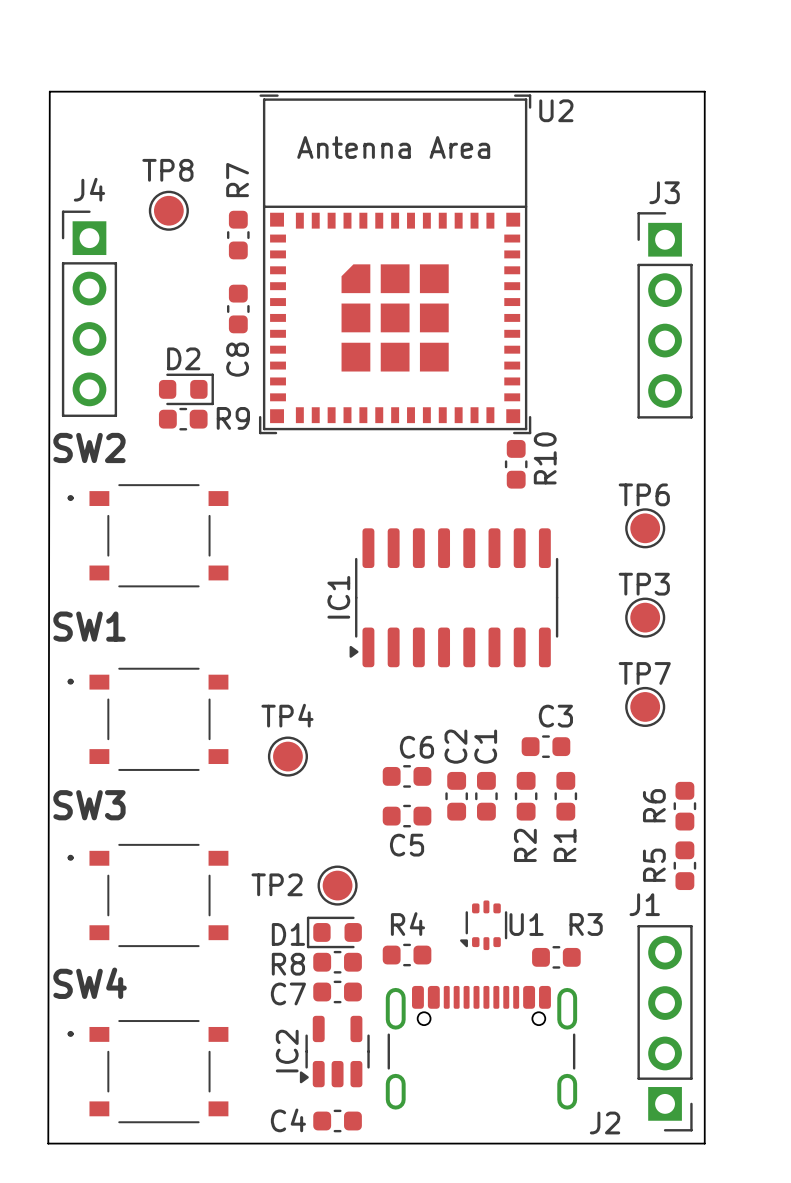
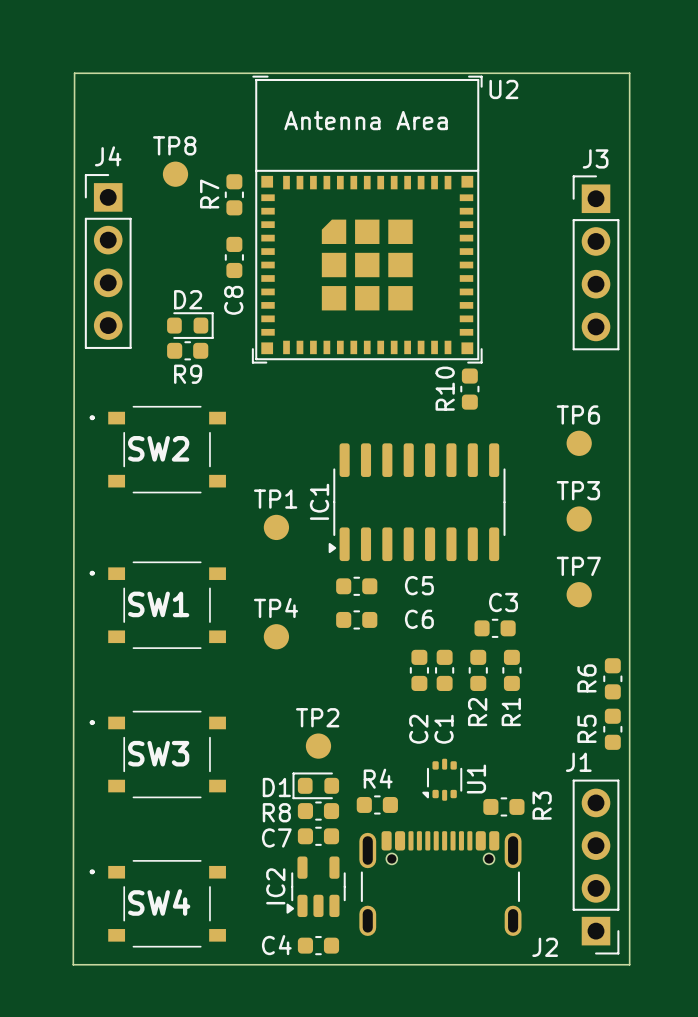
R7 name position: R7 (237, 180) -> R7 (209, 193)
TP8 footprint: [148, 190, 189, 231] -> [162, 161, 189, 187]
R9 name position: R9 (233, 418) -> R9 (188, 374)
SW2 name position: SW2 (89, 447) -> SW2 (158, 448)
R10 name position: R10 (545, 458) -> R10 (445, 388)
TP6 footprint: [625, 508, 666, 549] -> [566, 430, 592, 456]
TP3 footprint: [625, 597, 666, 638] -> [566, 506, 592, 532]
SW1 name position: SW1 (89, 626) -> SW1 (158, 604)
TP1: none -> (276, 527)
TP7 footprint: [625, 686, 666, 727] -> [566, 582, 592, 608]
TP4 footprint: [267, 736, 308, 777] -> [263, 624, 290, 650]
C2 name position: C2 (455, 746) -> C2 (418, 729)
C1 name position: C1 (485, 746) -> C1 (444, 729)
C6 name position: C6 (416, 747) -> C6 (419, 619)
C6 position: (407, 776) -> (356, 619)
SW3 name position: SW3 (89, 805) -> SW3 (158, 753)
C5 position: (407, 816) -> (356, 586)
C5 name position: C5 (407, 845) -> C5 (419, 585)
TP2 footprint: [317, 865, 358, 906] -> [305, 733, 332, 759]
TP2 name position: TP2 (277, 884) -> TP2 (317, 717)
U1 name rotation: 0° (526, 924) -> 90° counterclockwise (476, 779)
R3 name rotation: 0° (586, 924) -> 90° counterclockwise (542, 805)
SW4 name position: SW4 (90, 983) -> SW4 (159, 902)

